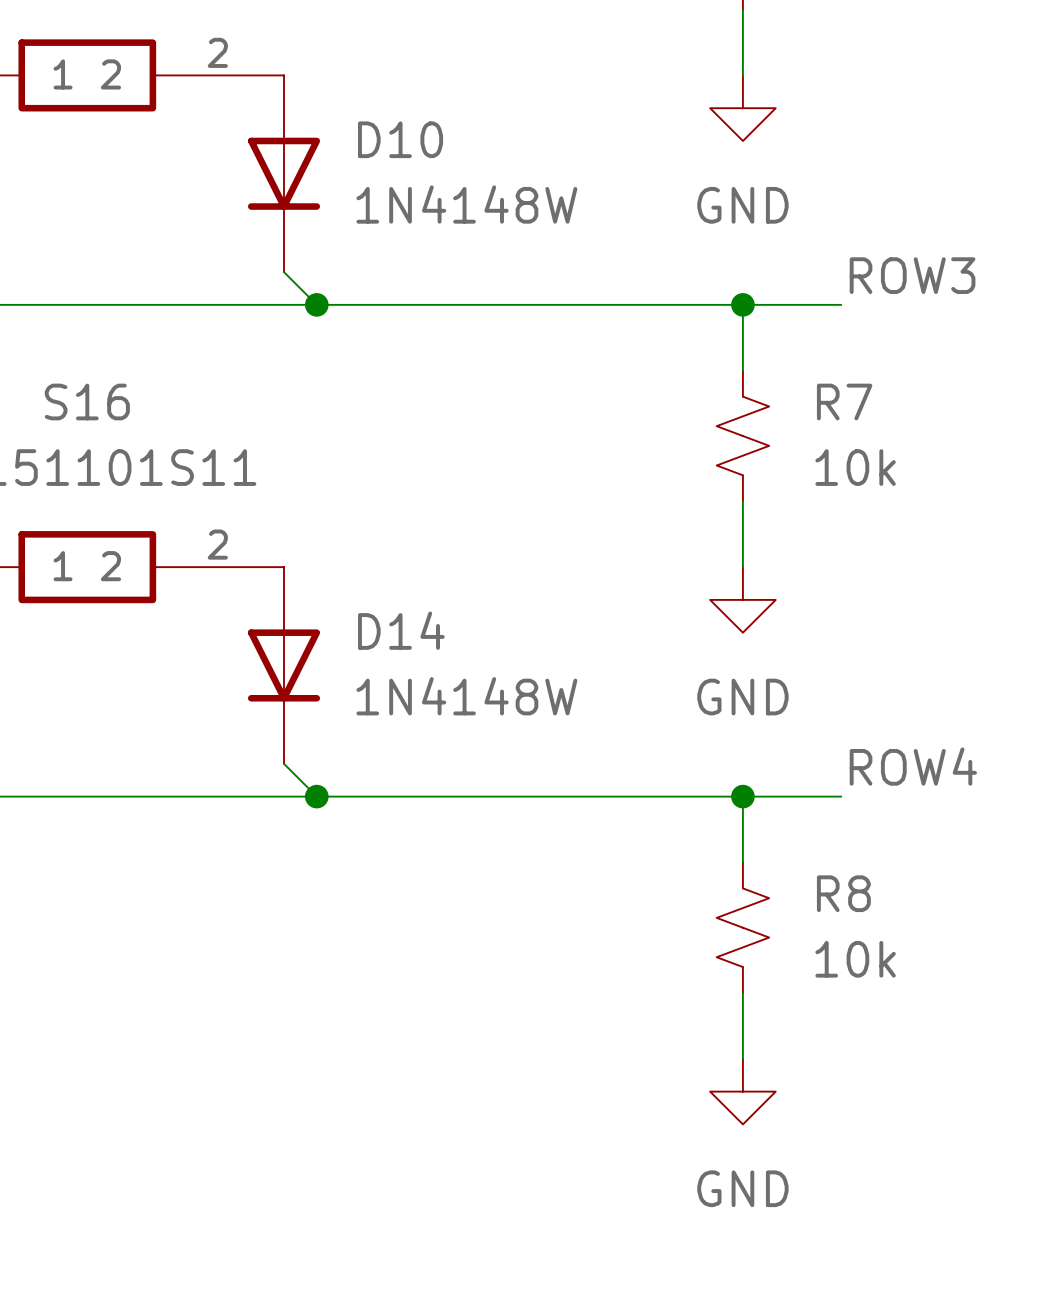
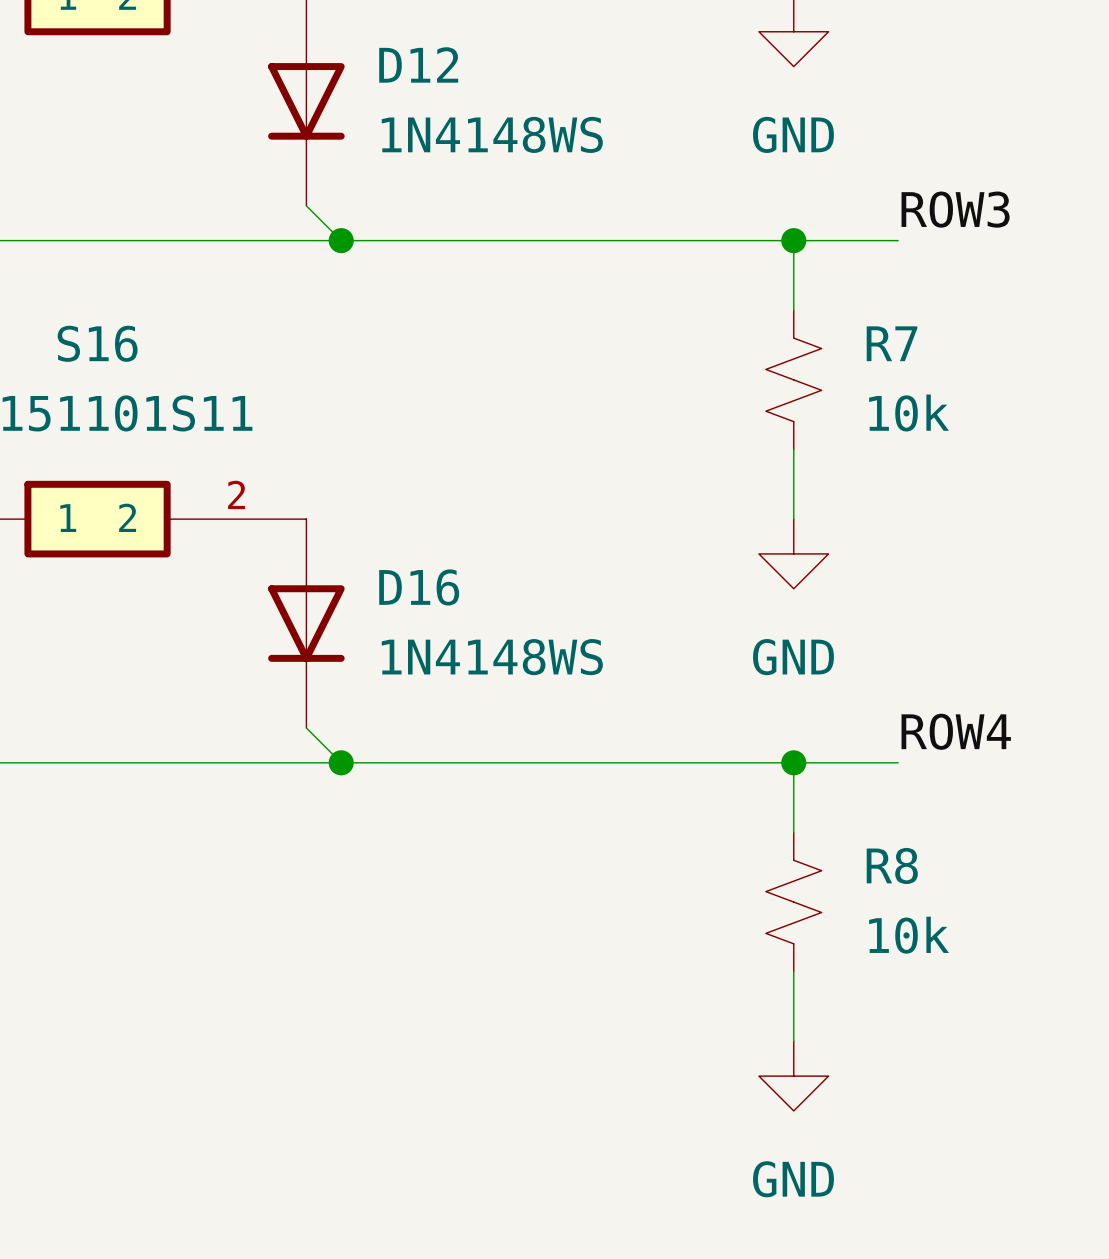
D10 name: D10 (400, 139) -> D12 (418, 64)
D10 value: 1N4148W (466, 204) -> 1N4148WS (492, 134)
D14 name: D14 (401, 630) -> D16 (419, 587)
D14 value: 1N4148W (466, 696) -> 1N4148WS (492, 657)

